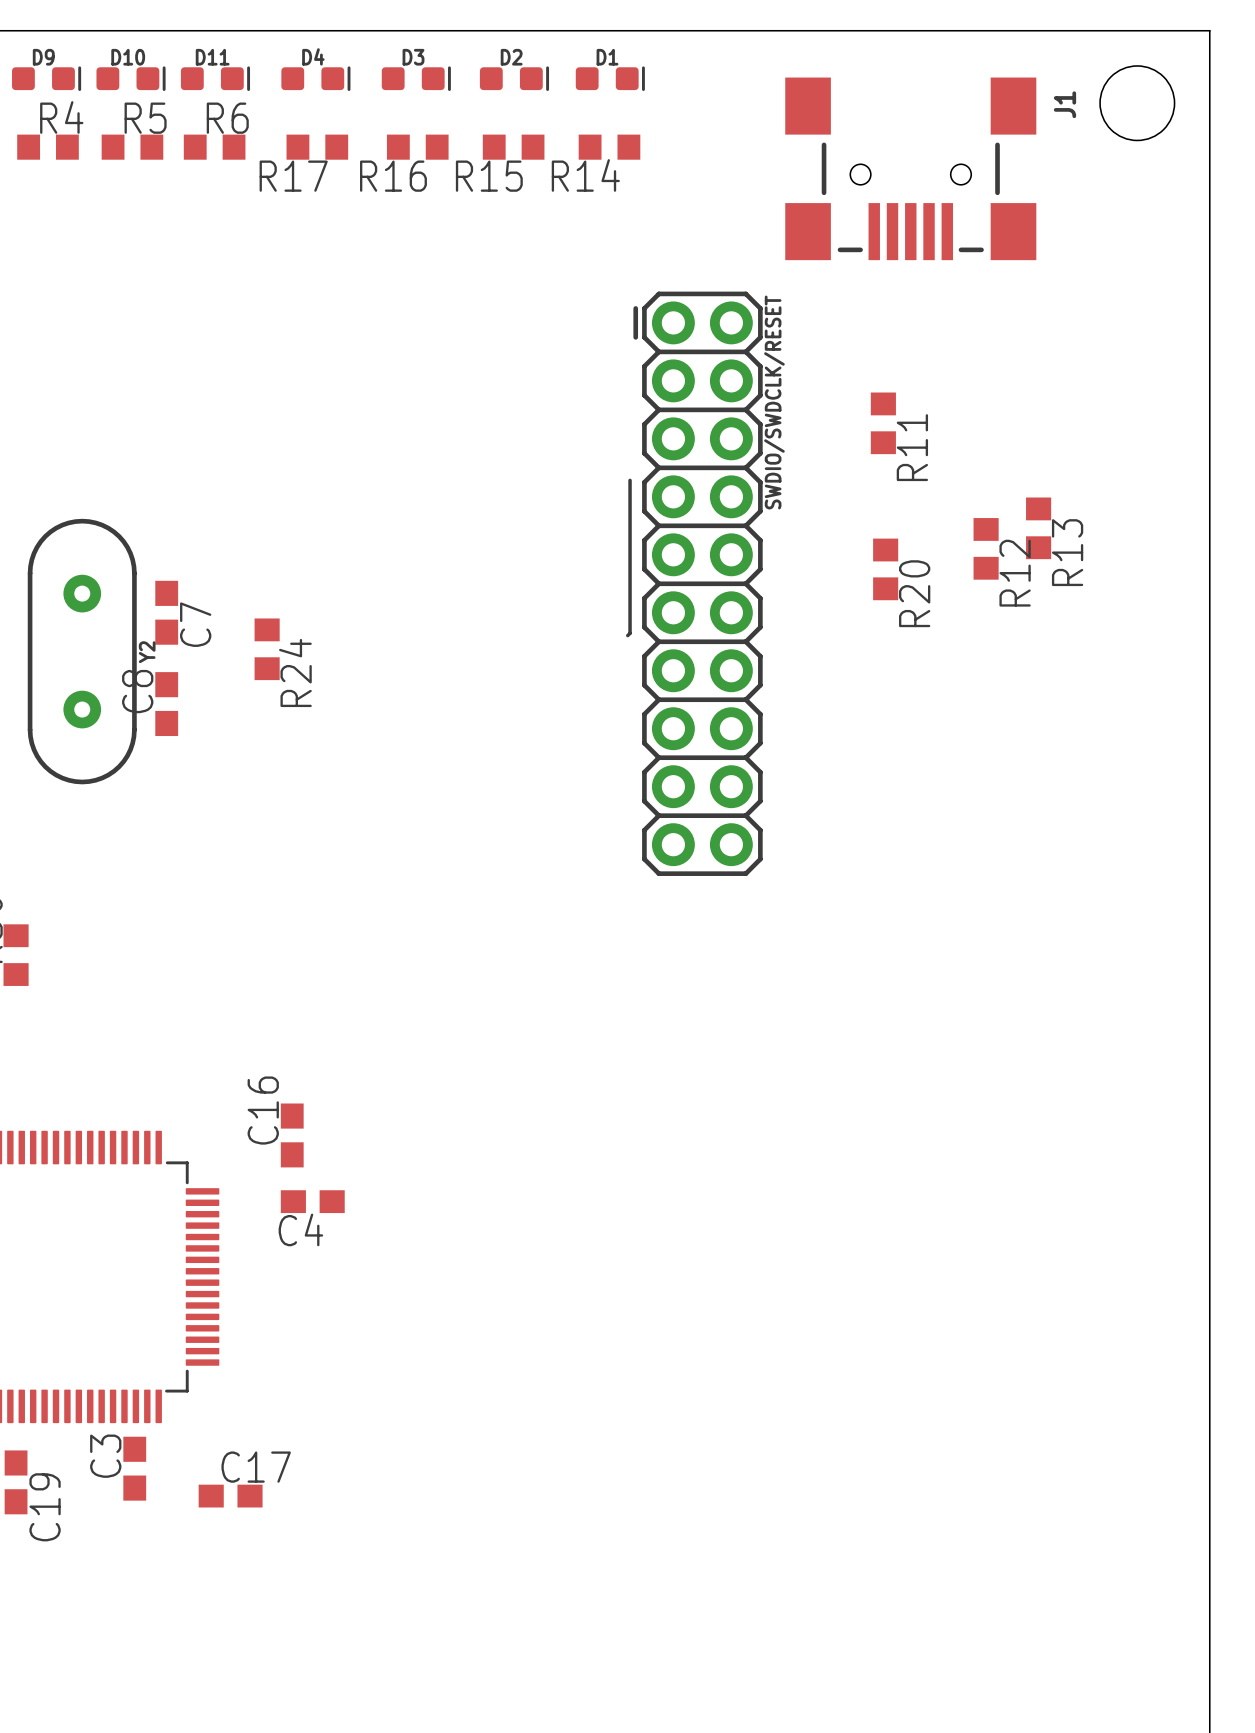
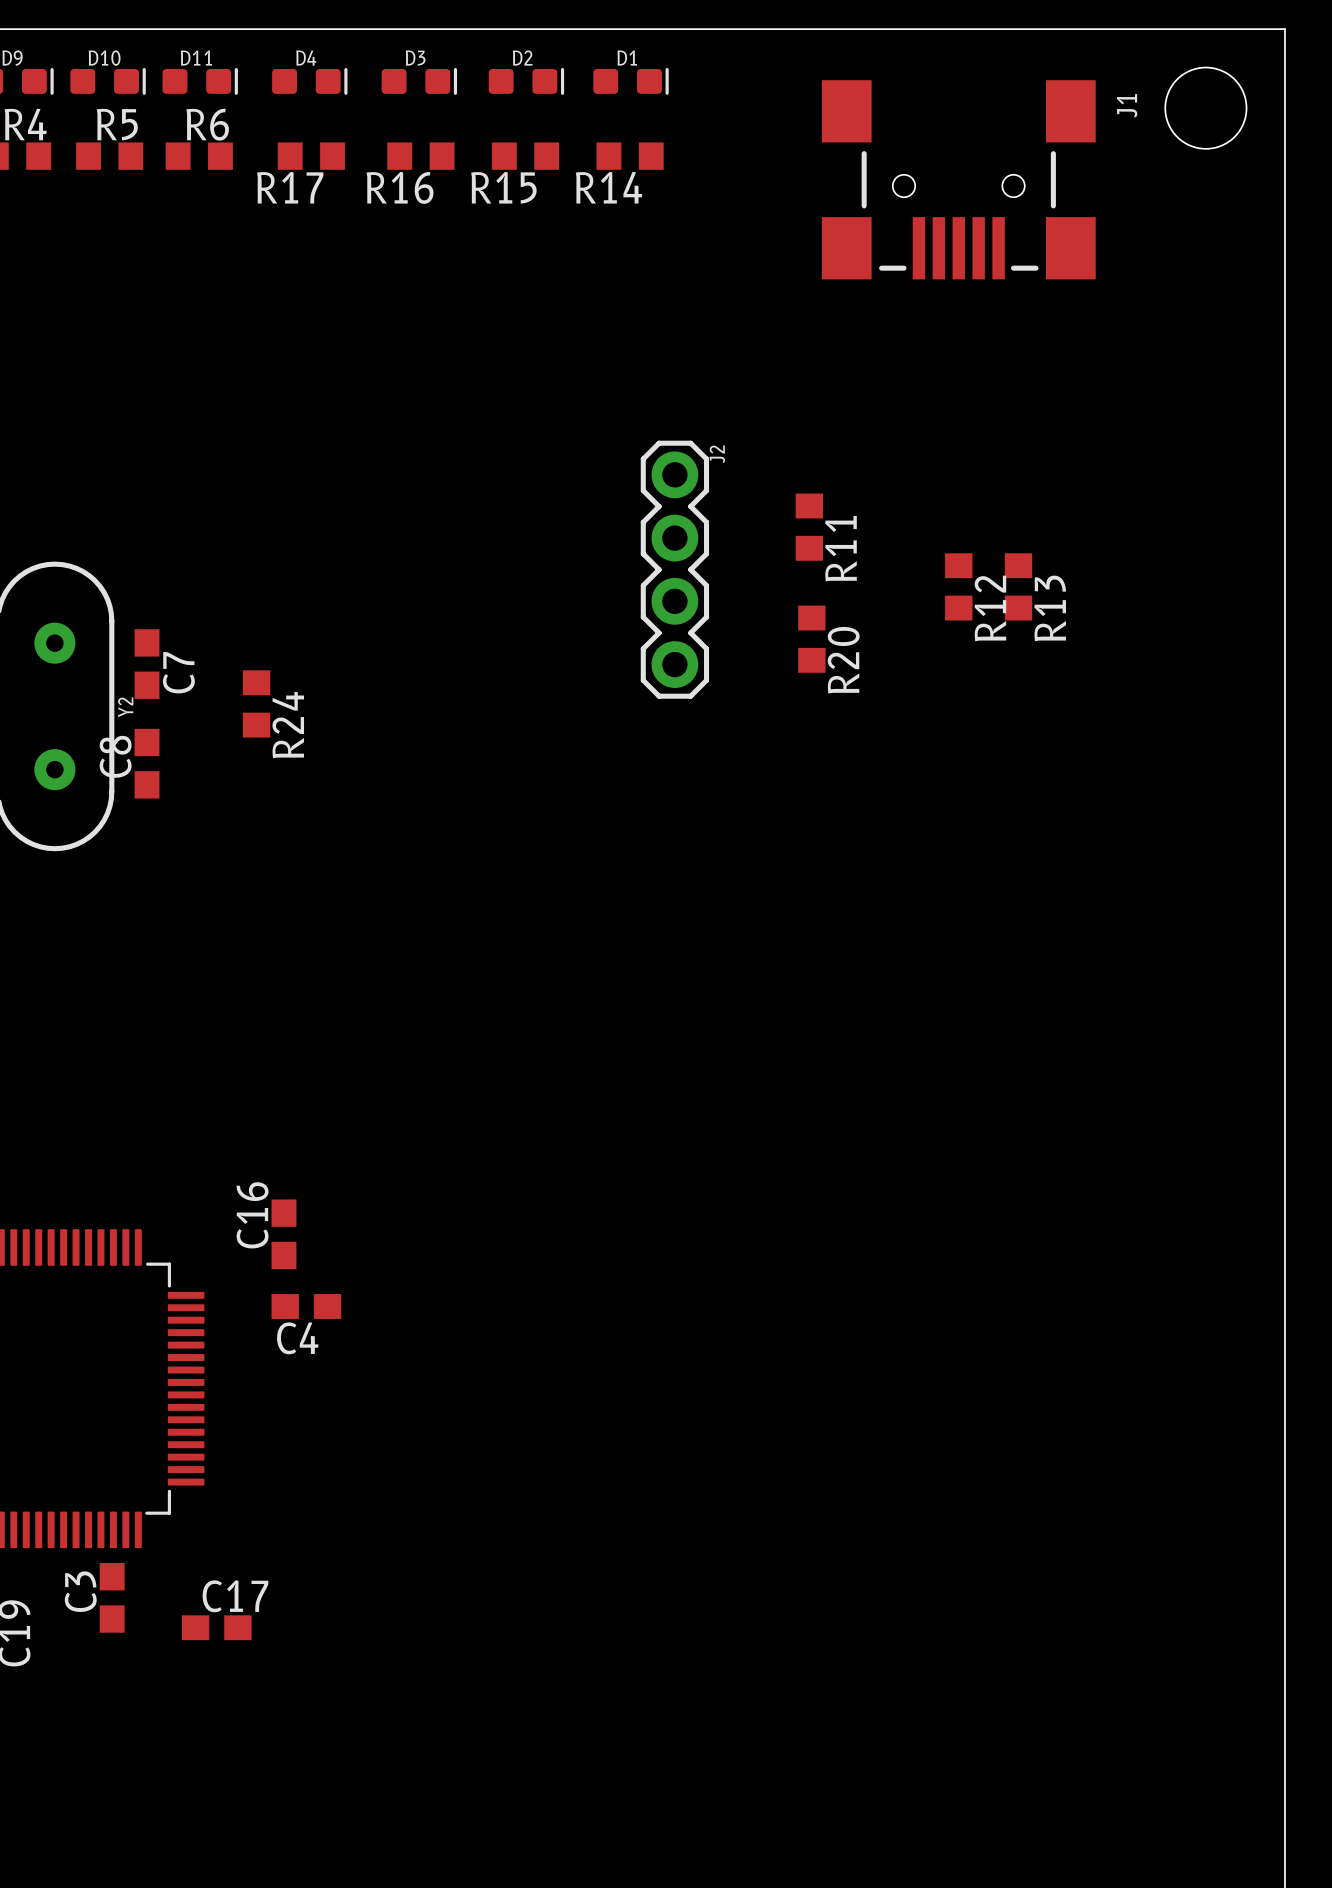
R11 position: (883, 423) -> (809, 527)
line: (630, 480) (630, 633) (627, 635) -> none
J2: none -> (674, 569)
R13 position: (1038, 528) -> (1018, 586)
R12 position: (986, 548) -> (958, 586)
R20 position: (885, 569) -> (811, 639)
SWDIO/SWDCLK/RESET: (698, 583) -> none

